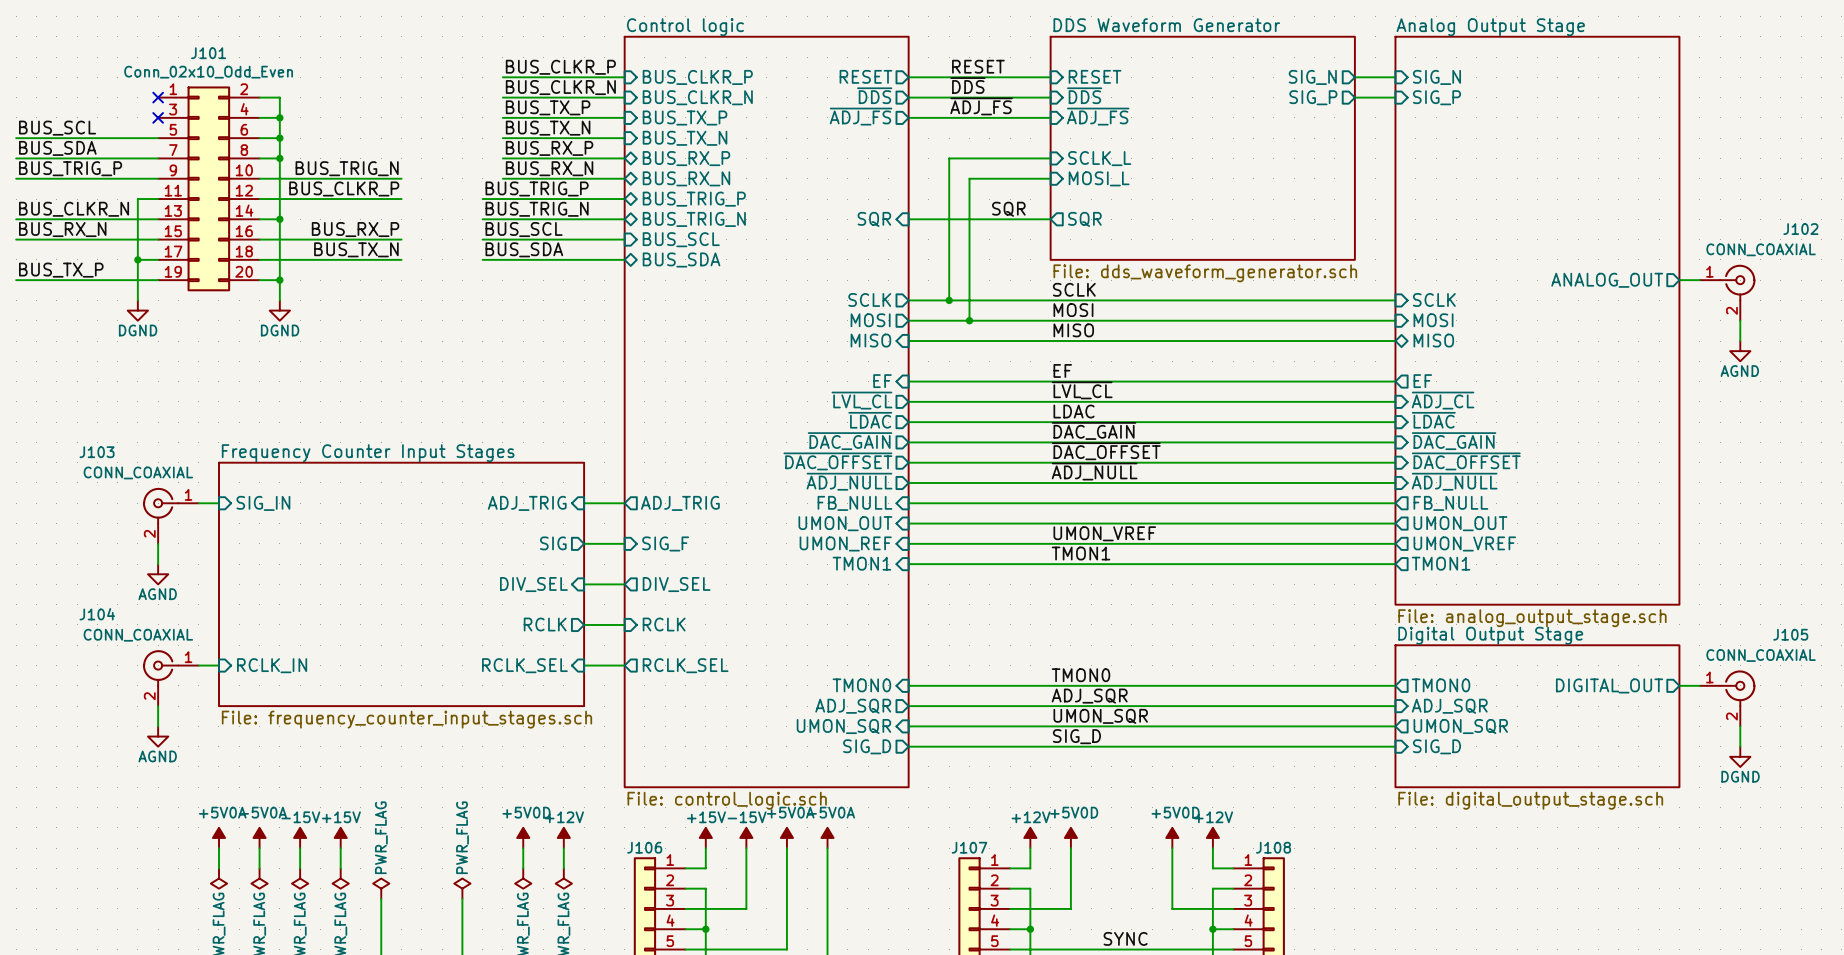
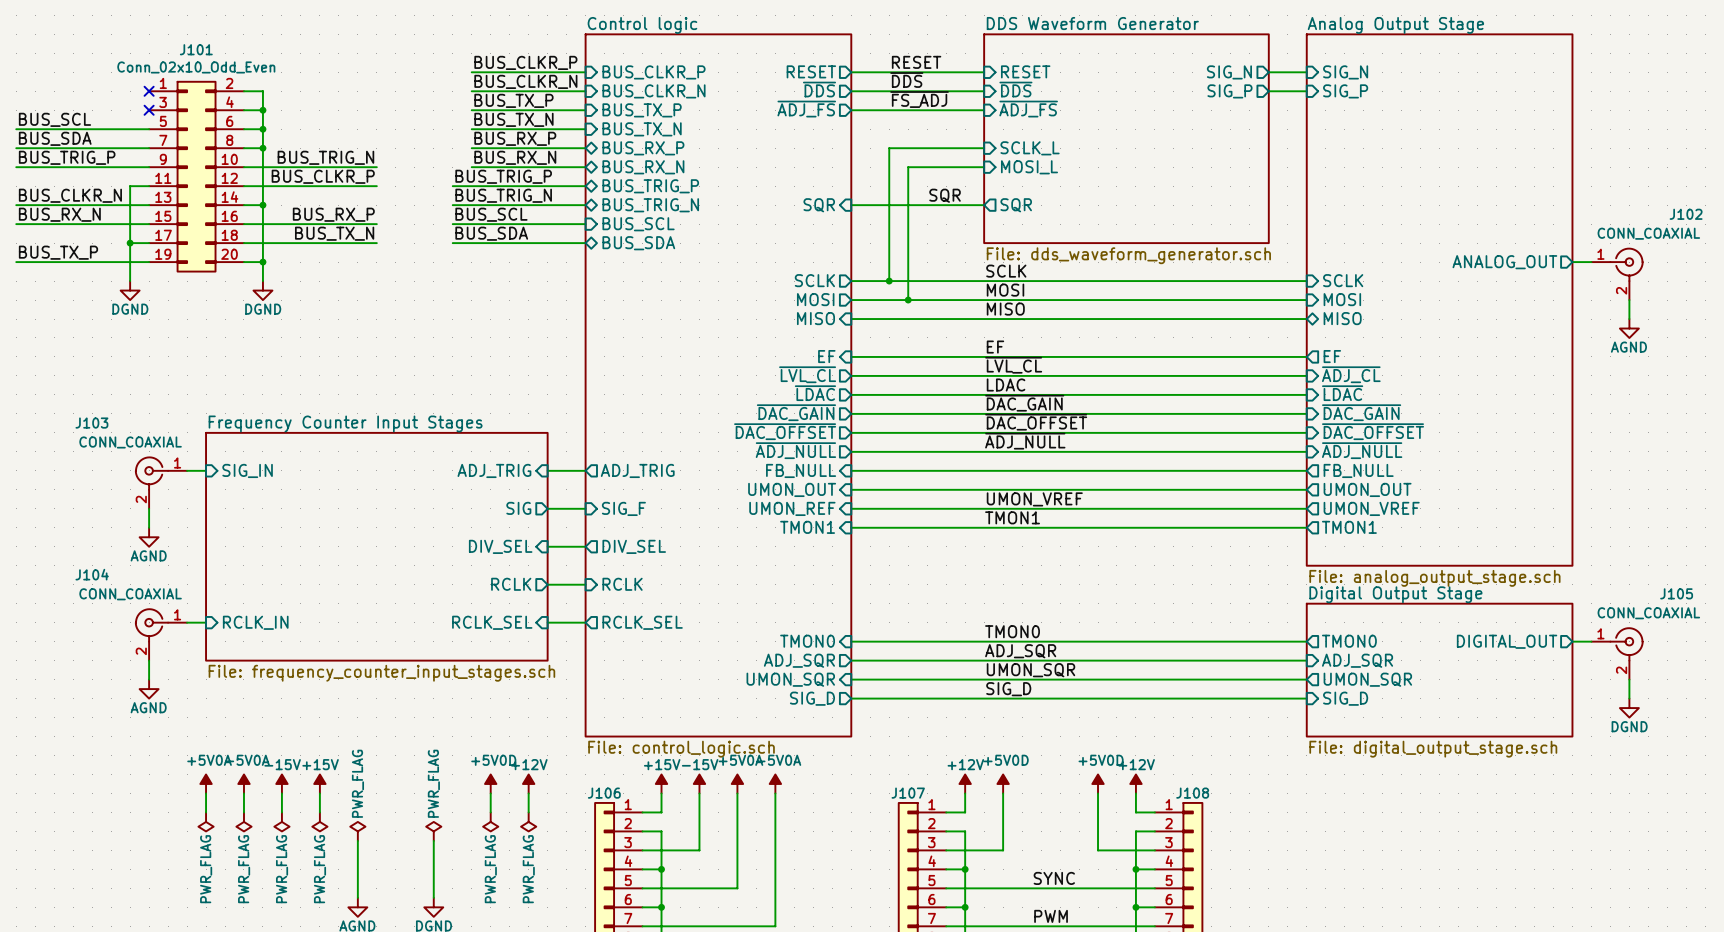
label: ~{ADJ_FS} (981, 106) -> ~{FS_ADJ} (919, 99)

